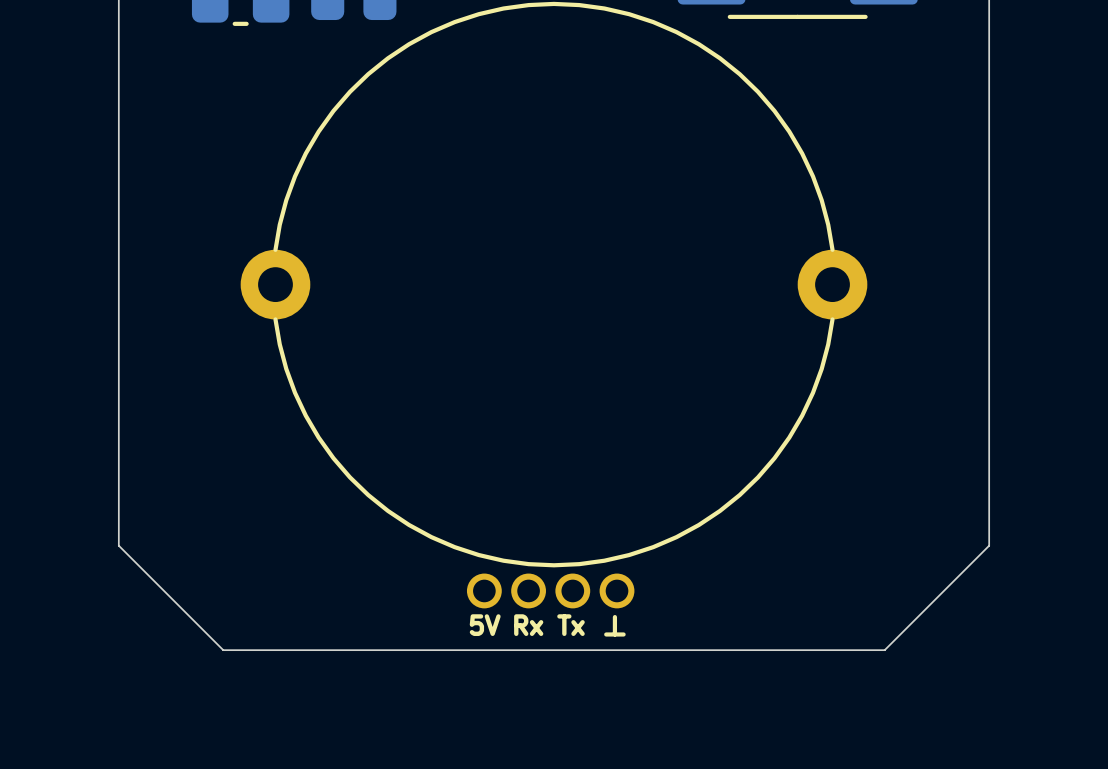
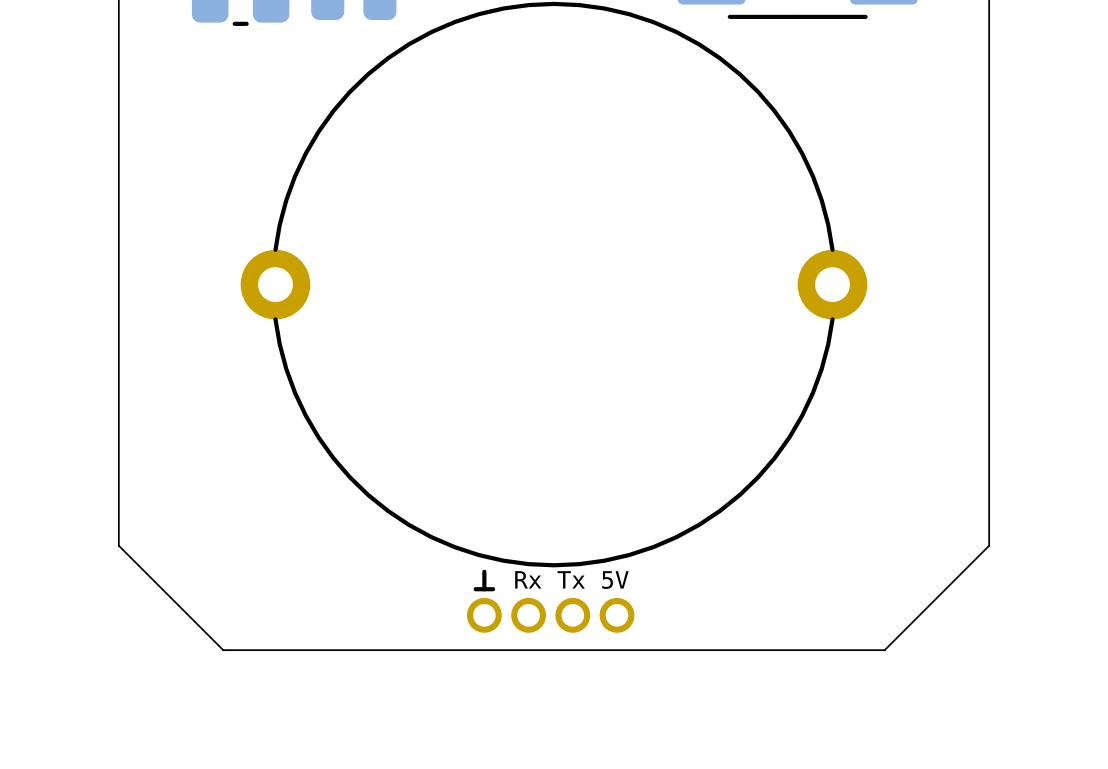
part footprint: [466, 573, 635, 637] -> [466, 569, 635, 633]

